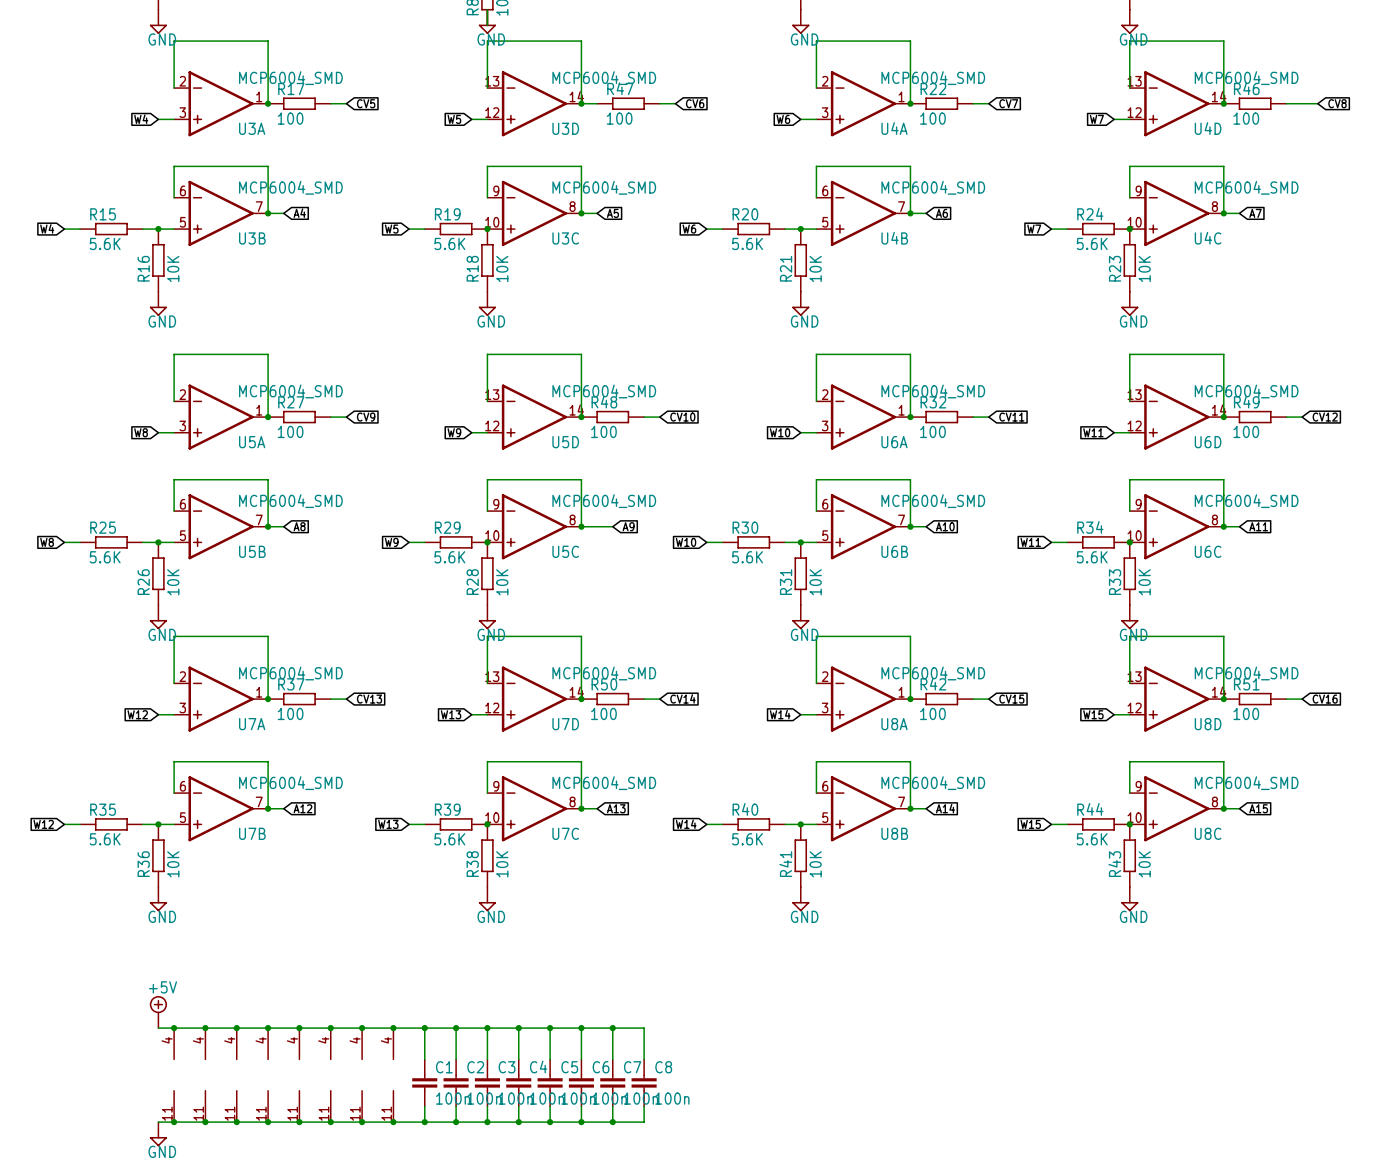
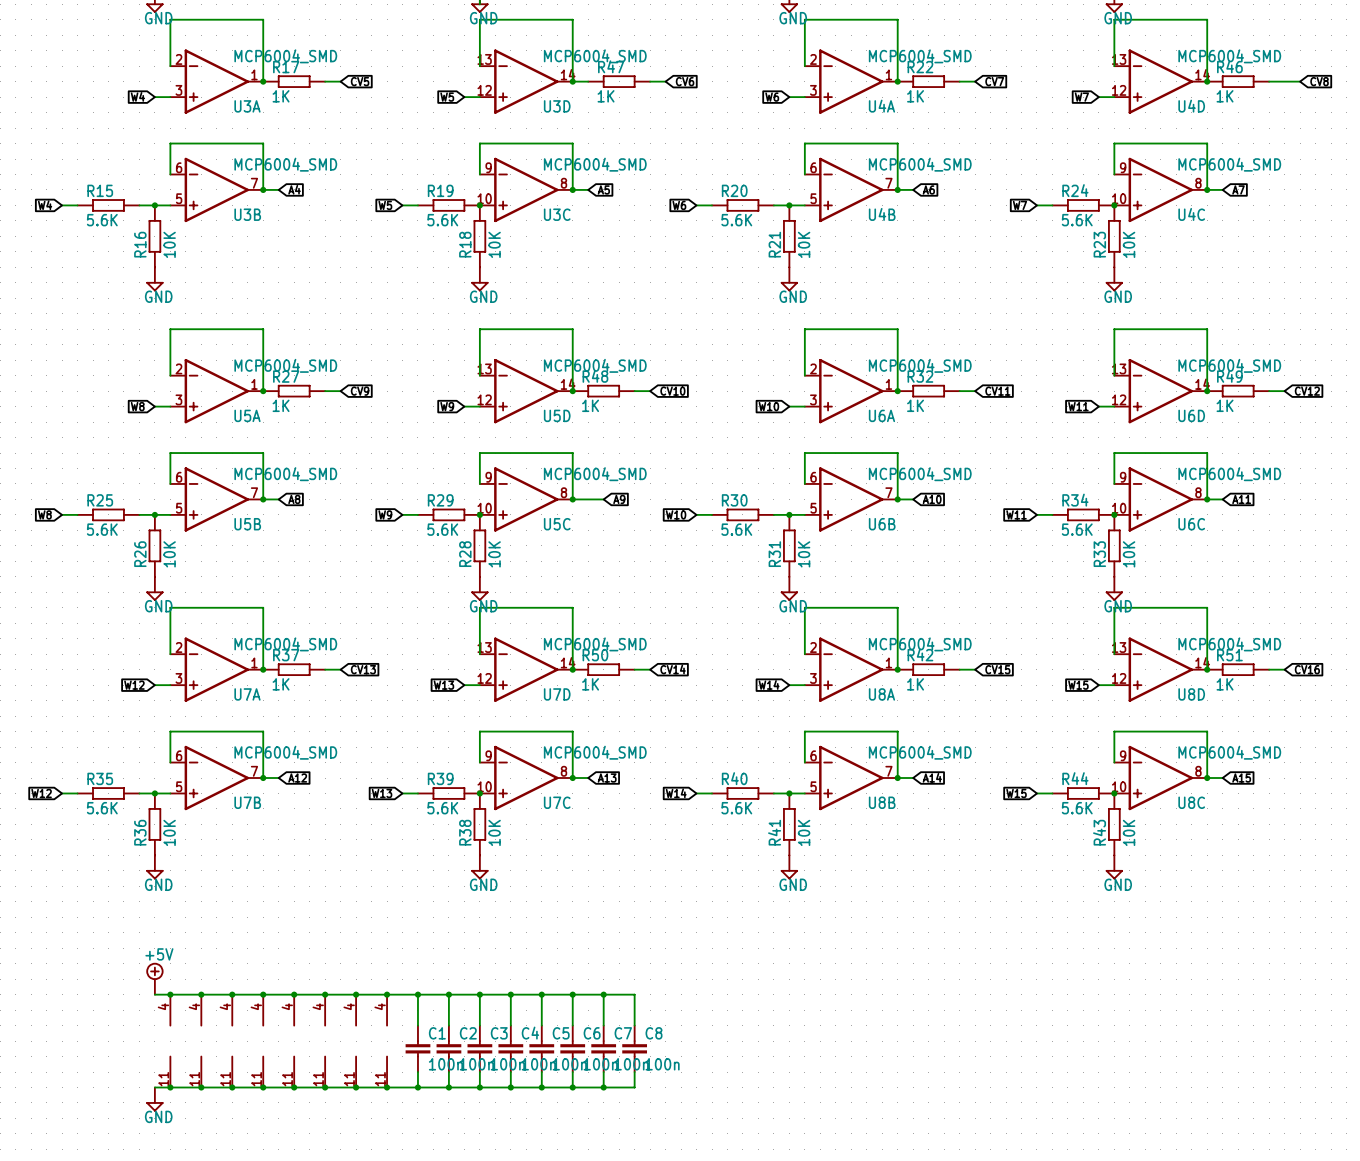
R17 value: 100 (290, 118) -> 1K (281, 96)
R47 value: 100 (619, 118) -> 1K (606, 96)
R22 value: 100 (932, 118) -> 1K (915, 96)
R46 value: 100 (1246, 118) -> 1K (1225, 96)
R27 value: 100 (290, 431) -> 1K (281, 405)
R48 value: 100 (603, 431) -> 1K (590, 405)
R32 value: 100 (932, 431) -> 1K (915, 405)
R49 value: 100 (1246, 431) -> 1K (1225, 405)
R37 value: 100 (290, 713) -> 1K (281, 684)
R50 value: 100 (603, 713) -> 1K (590, 684)
R42 value: 100 (932, 713) -> 1K (915, 684)
R51 value: 100 (1246, 713) -> 1K (1225, 684)

